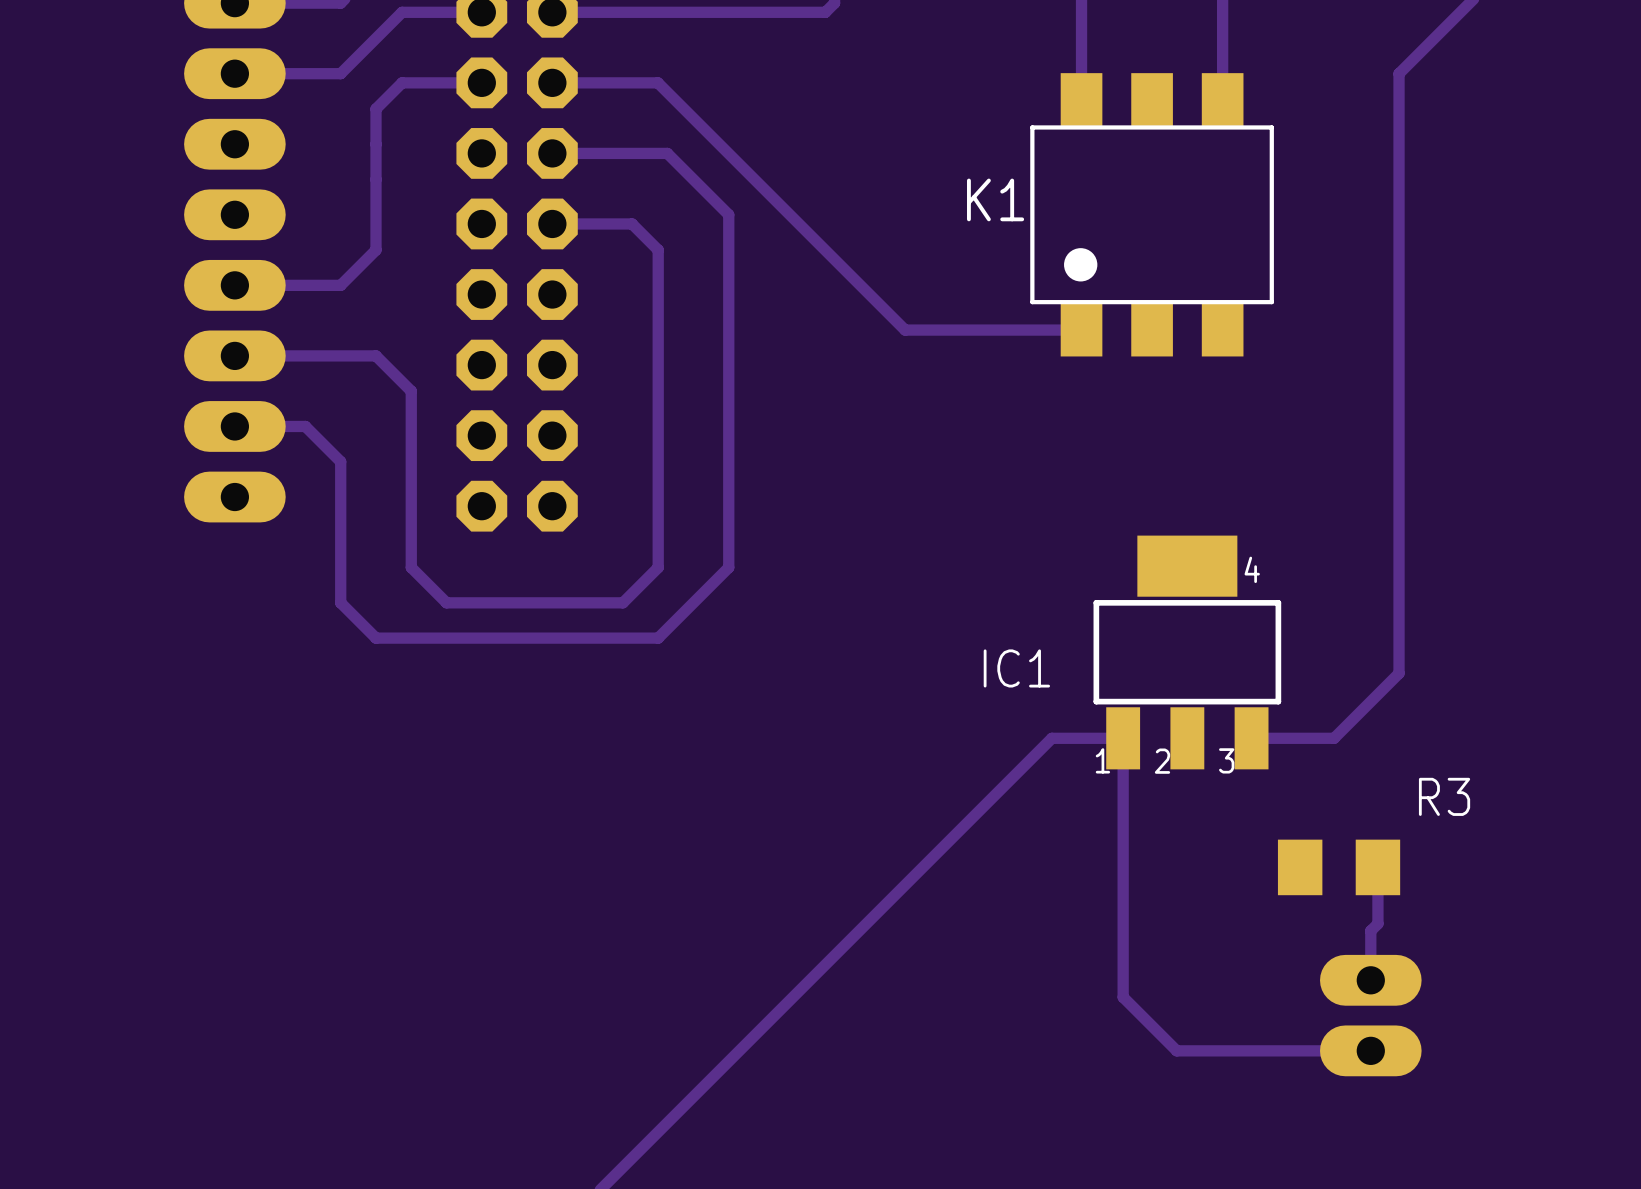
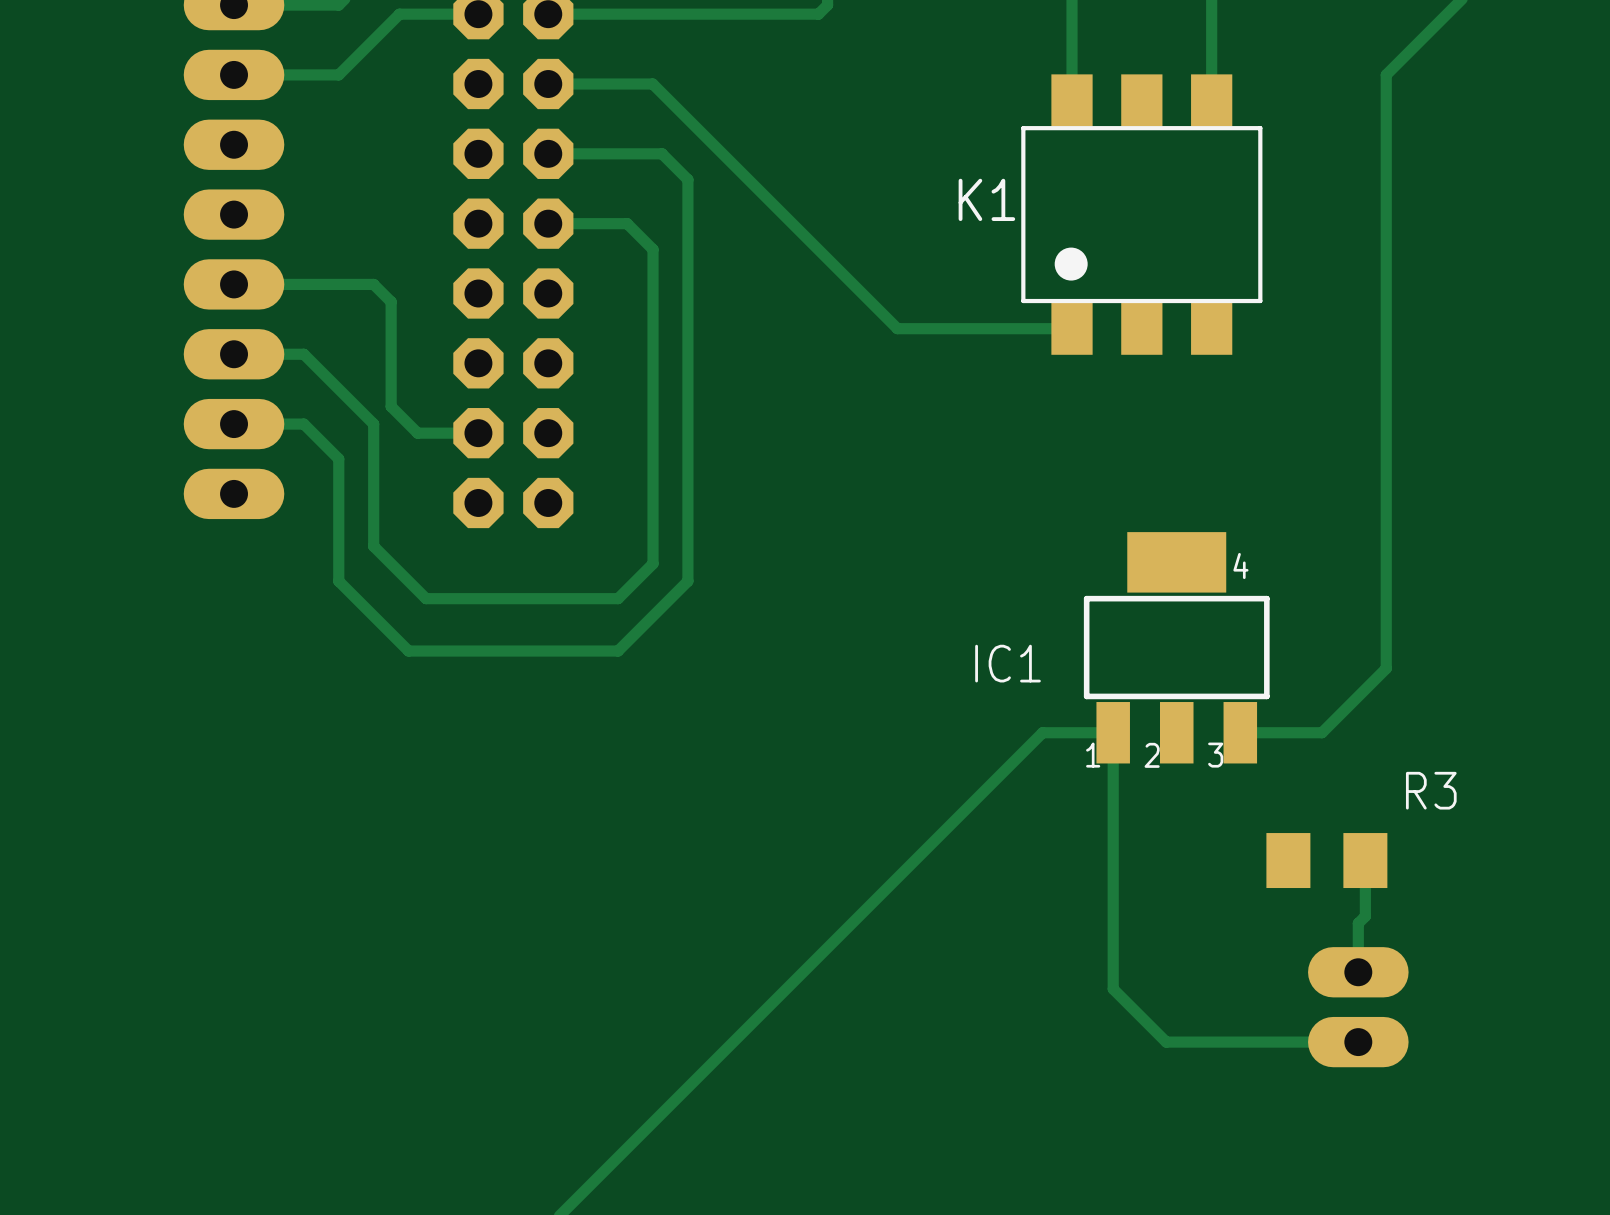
track: (481, 82) (402, 82) (375, 108) (375, 250) (340, 285) -> (478, 433) (417, 433) (391, 406) (391, 301) (373, 284) (338, 284)
track: (693, 179) (728, 214) (728, 567) (658, 638) (375, 638) (340, 602) (340, 585) -> (687, 179) (687, 581) (618, 651) (408, 651) (338, 581)
track: (305, 355) (375, 355) (411, 391) (411, 567) (446, 602) -> (303, 354) (373, 424) (373, 546) (426, 598) (443, 598)

